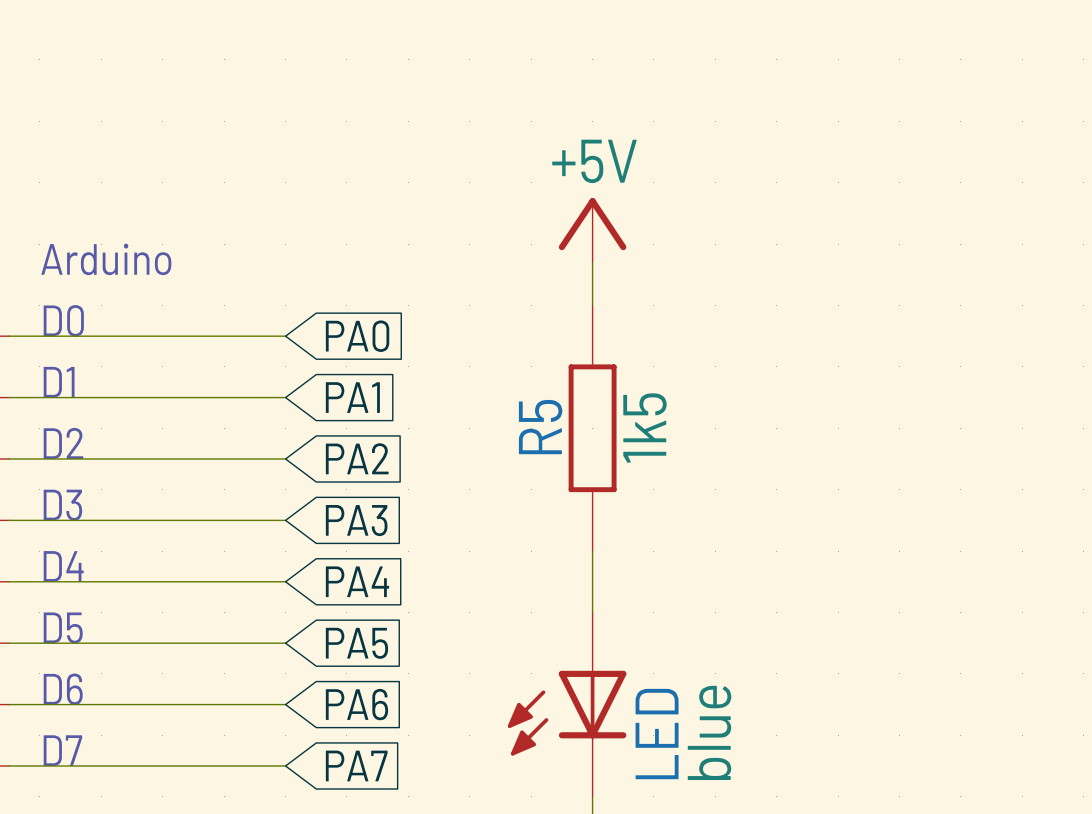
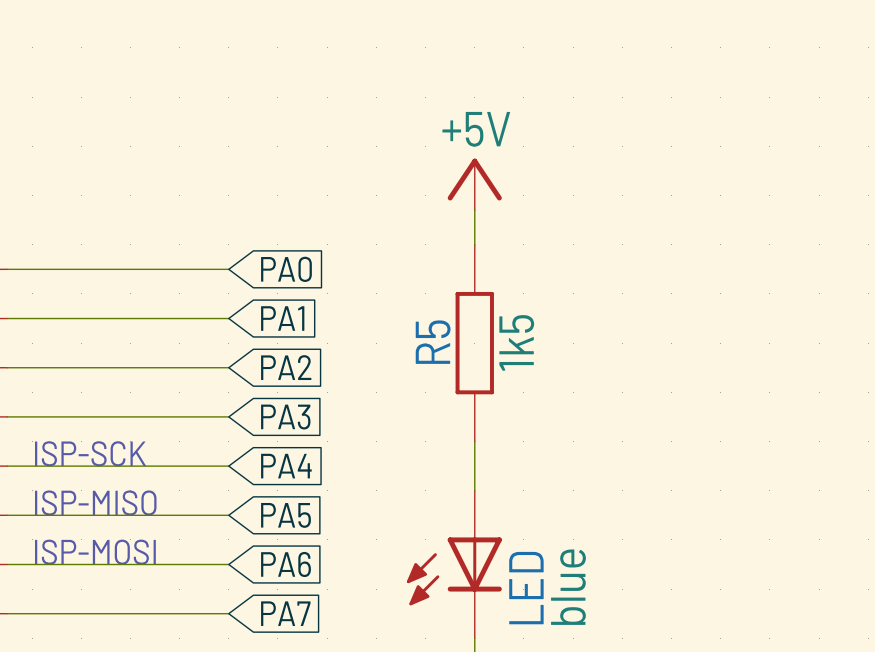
text: Arduino (106, 259) -> none
text: D0 (63, 320) -> none
text: D1 (59, 382) -> none
text: D2 (63, 443) -> none
text: D3 (62, 505) -> none
text: D4 (63, 566) -> ISP-SCK (90, 453)
text: D5 (63, 627) -> ISP-MISO (95, 503)
text: D6 (63, 689) -> ISP-MOSI (95, 552)
text: D7 (62, 750) -> none

